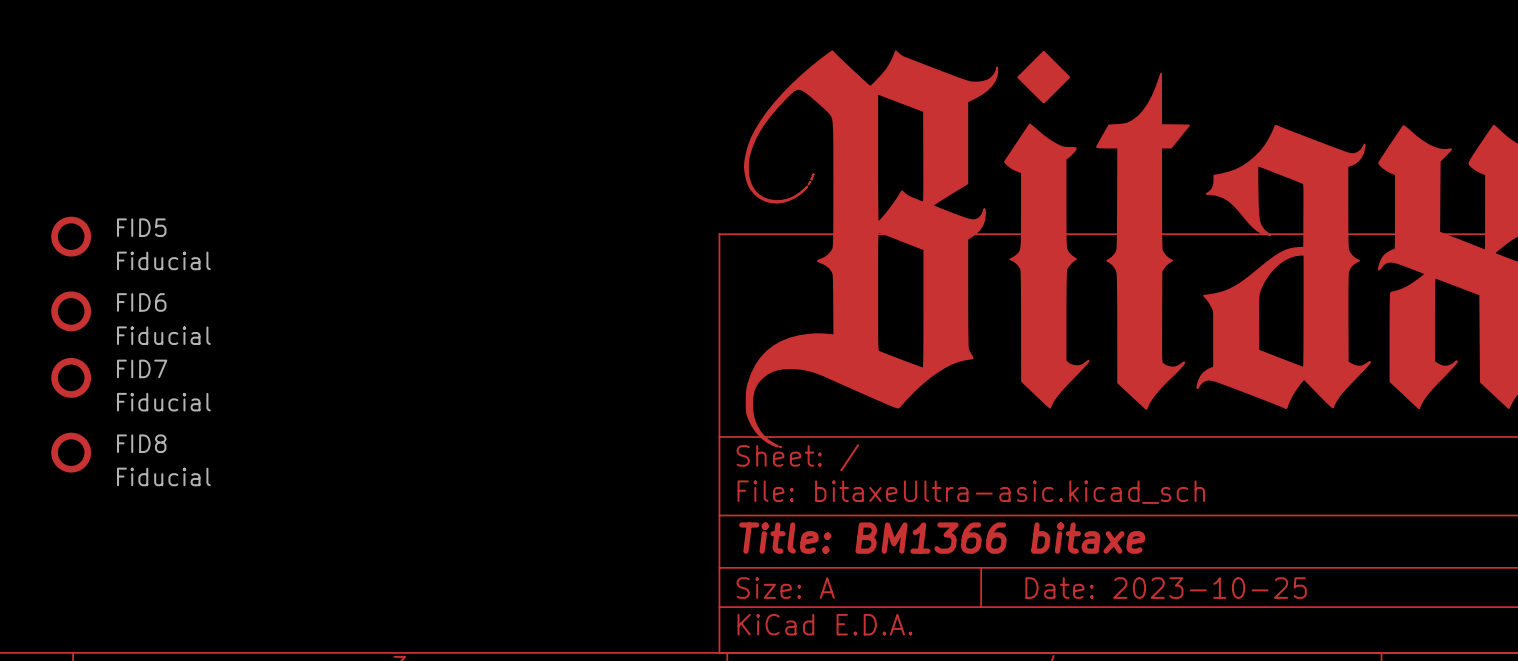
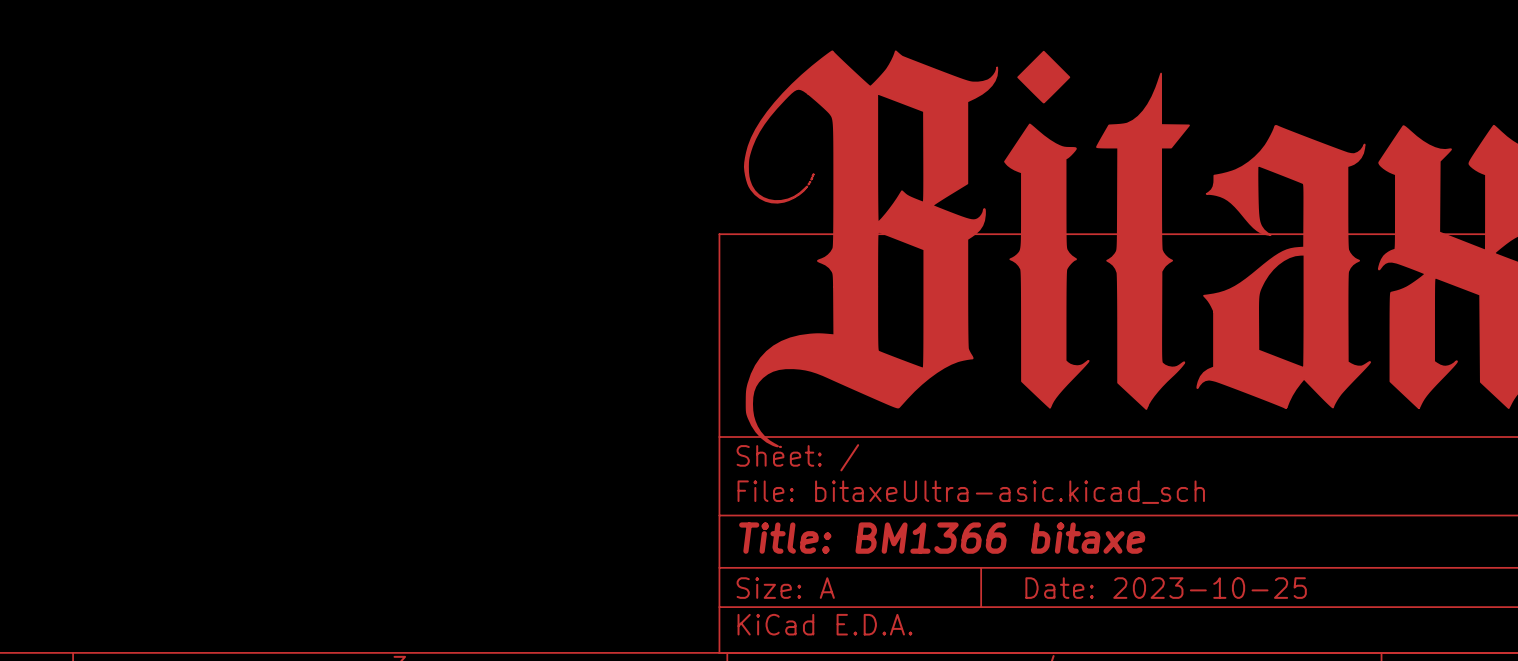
FID5: Fiducial (71, 236) -> none
FID6: Fiducial (71, 311) -> none
FID7: Fiducial (71, 377) -> none
FID8: Fiducial (71, 452) -> none

